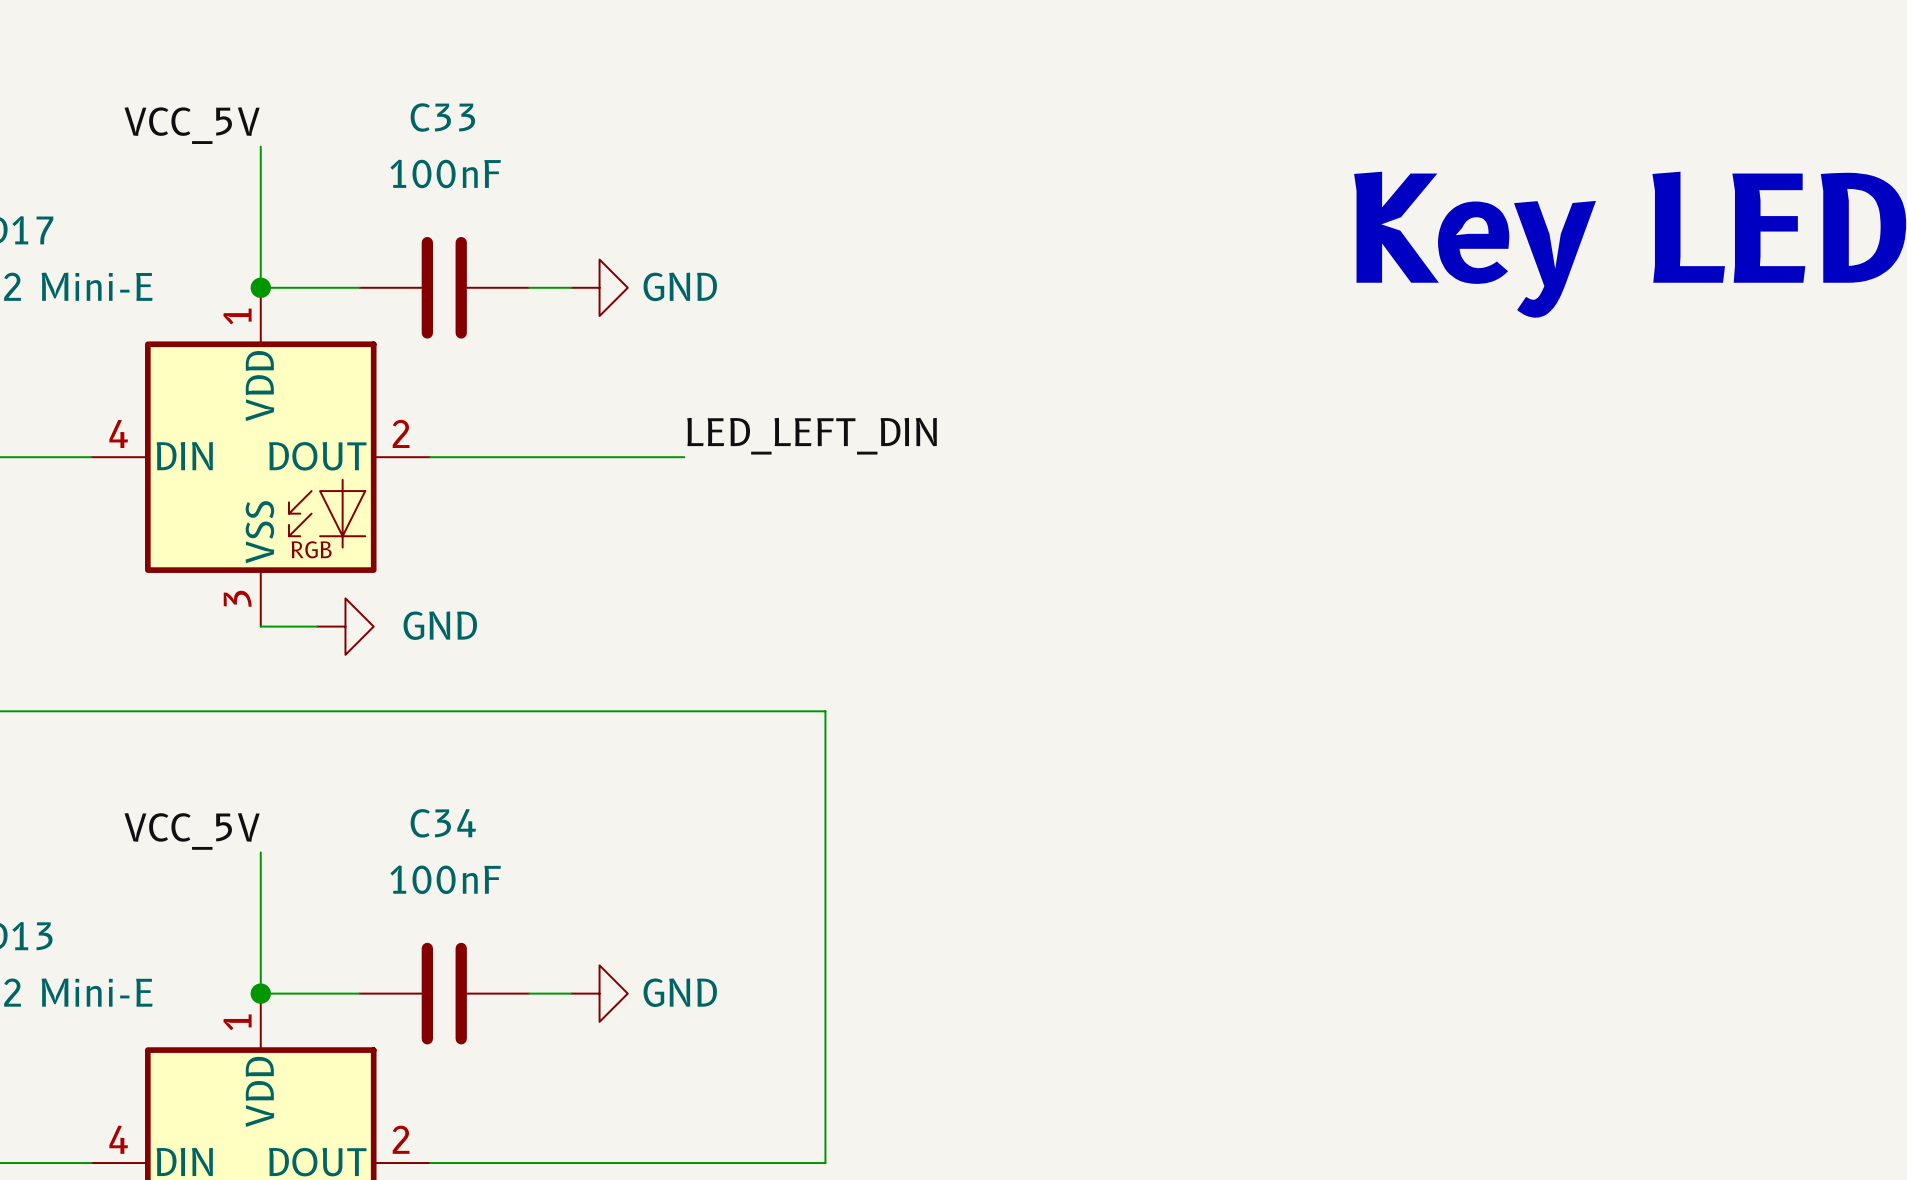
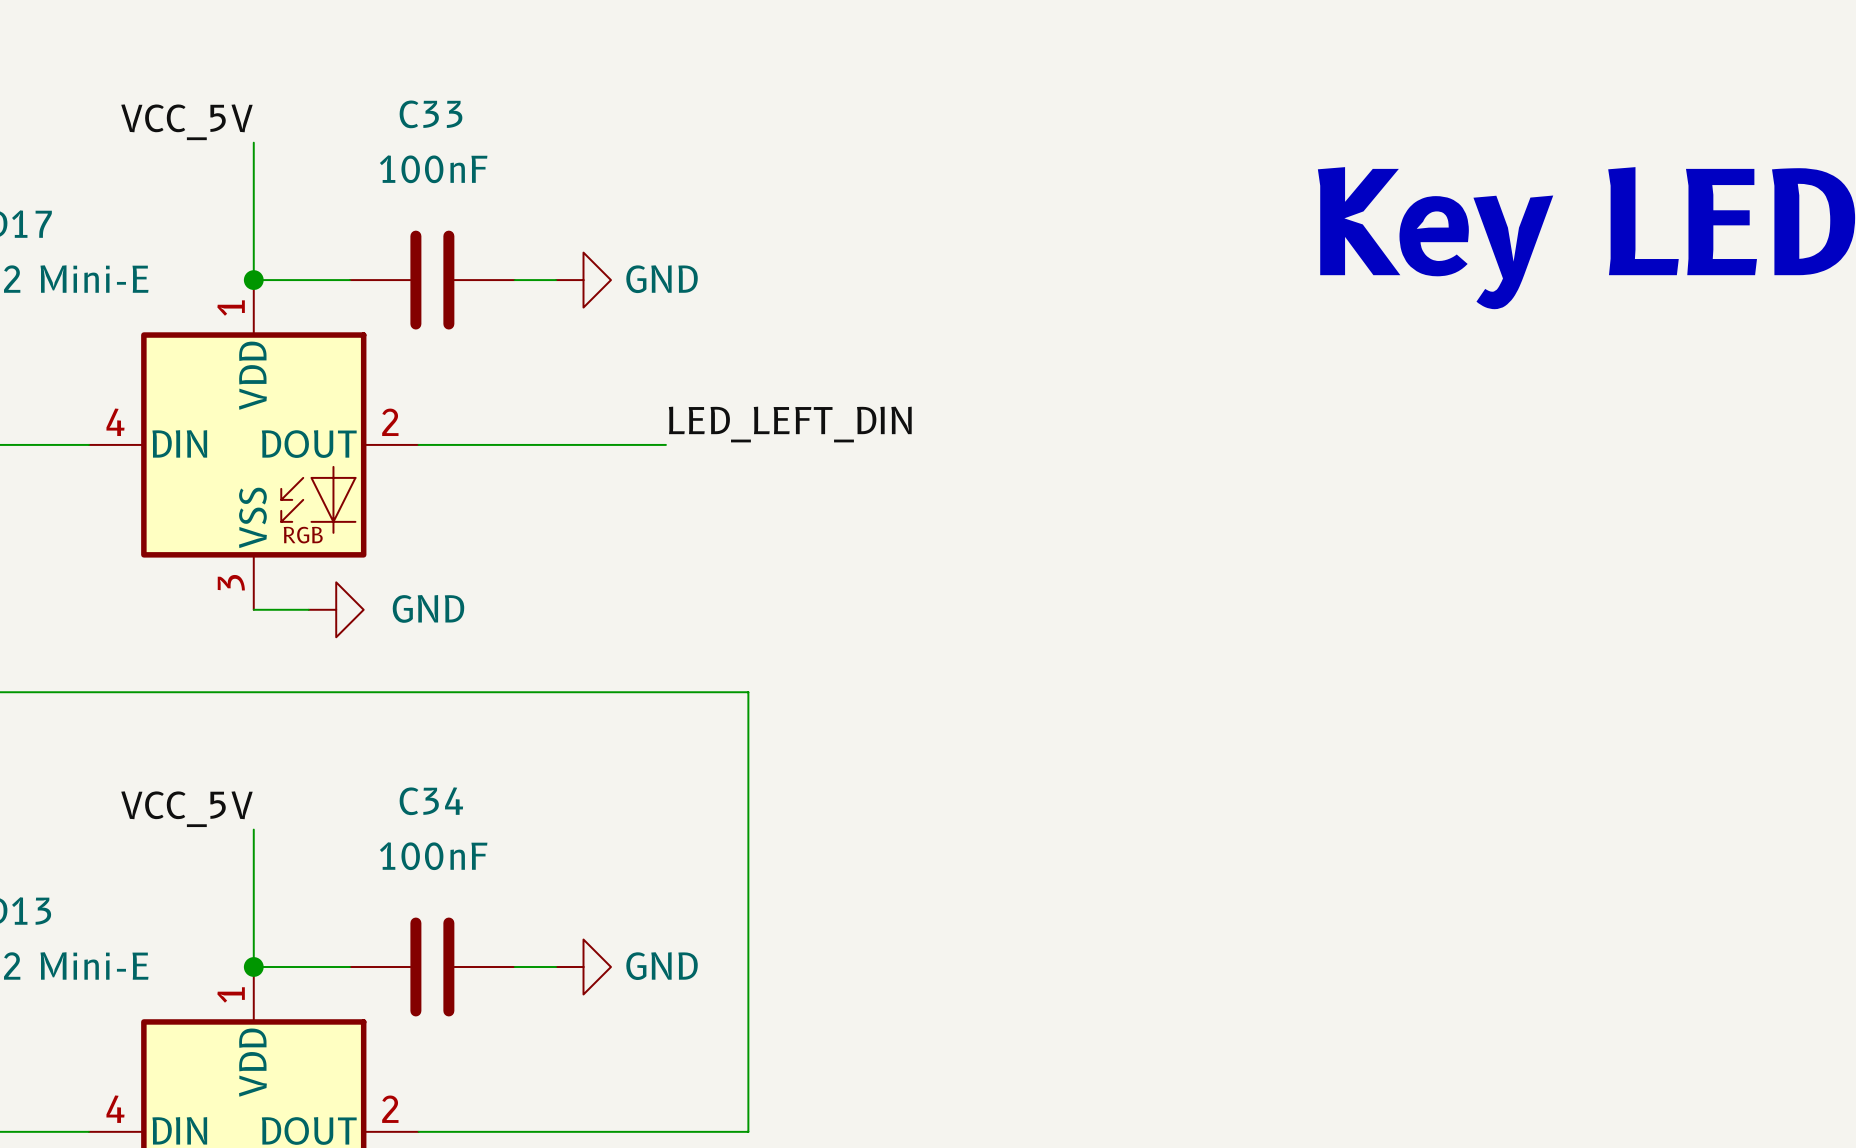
wire: (768, 711) (825, 711) (825, 1163) (768, 1163) -> (748, 692) (748, 1131)

